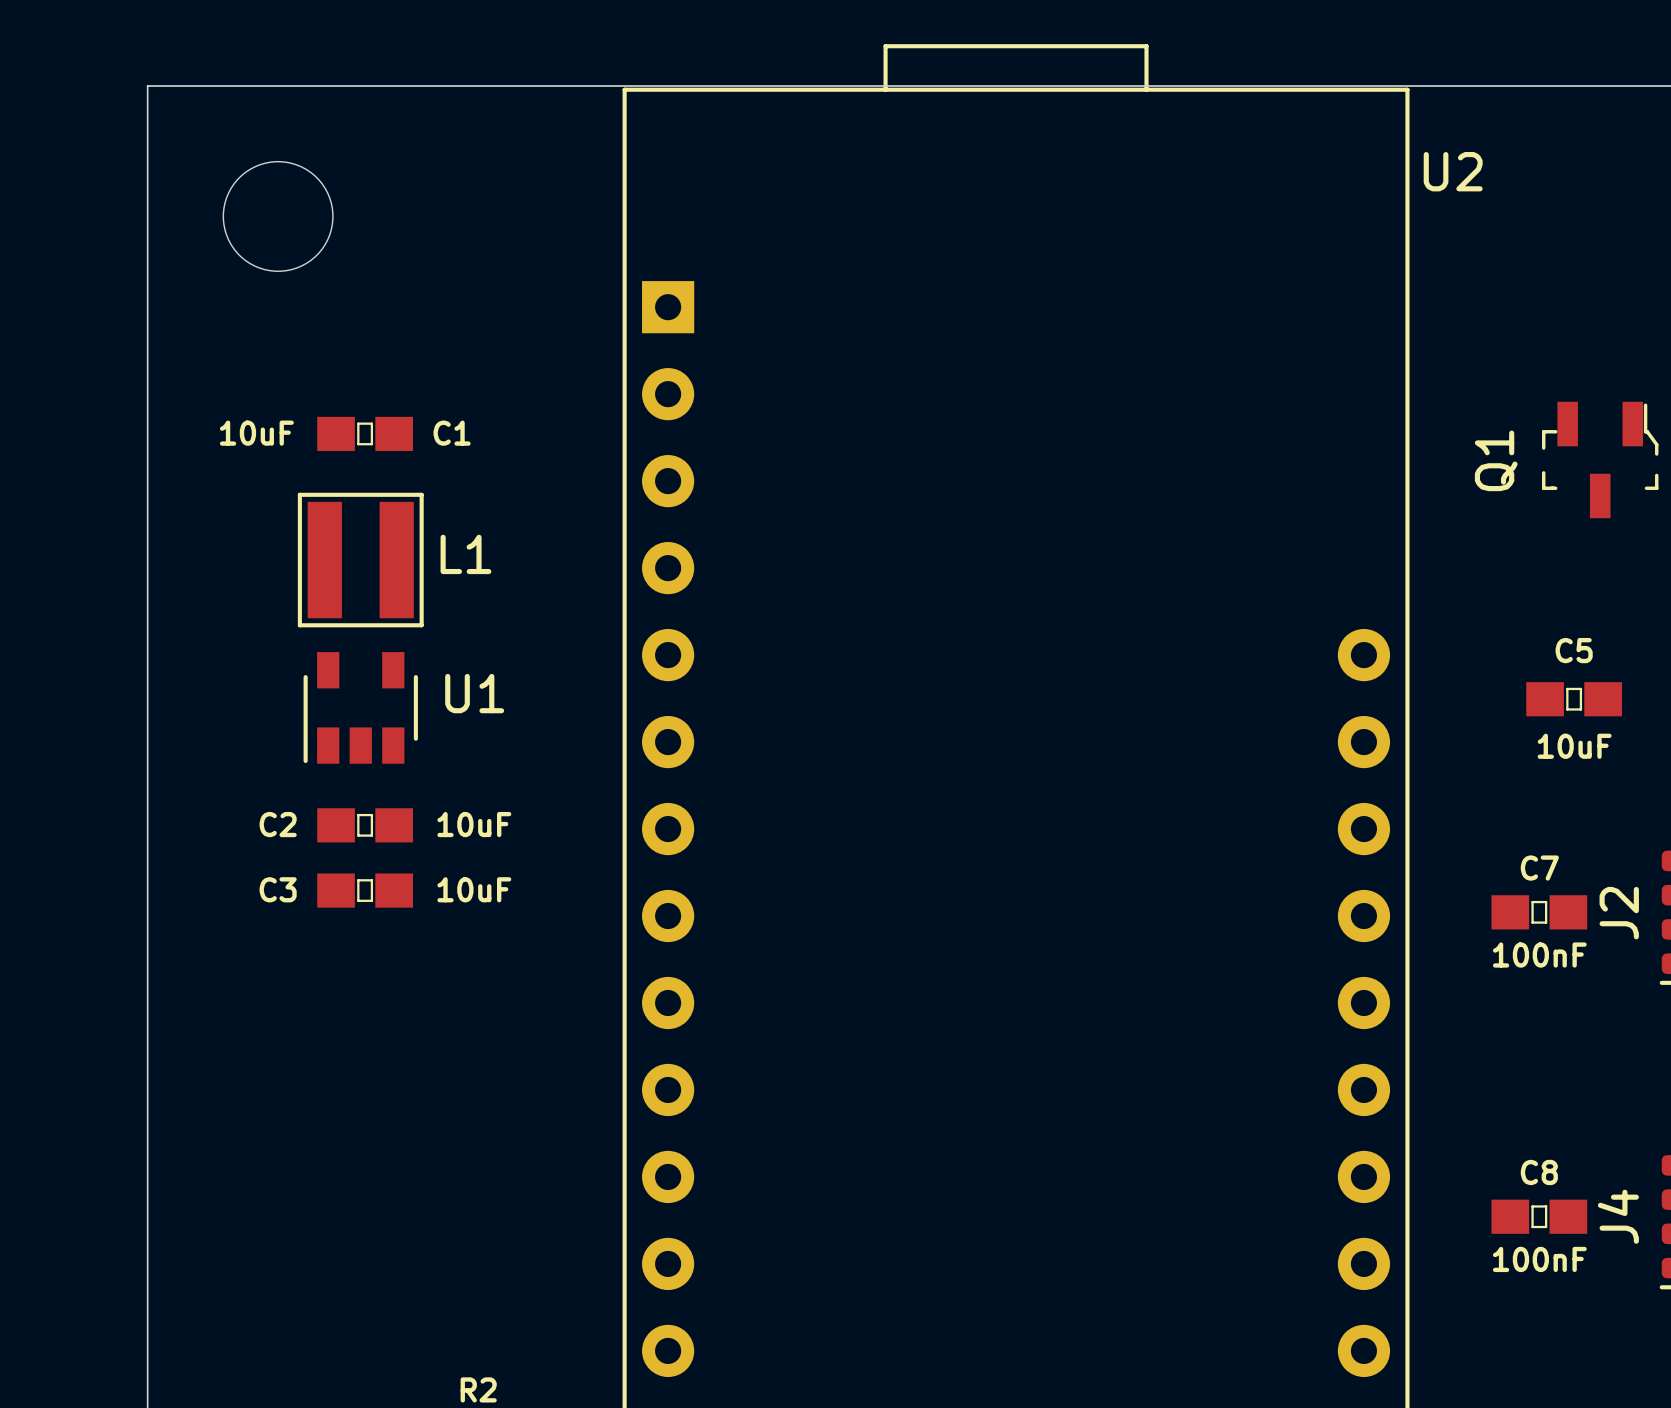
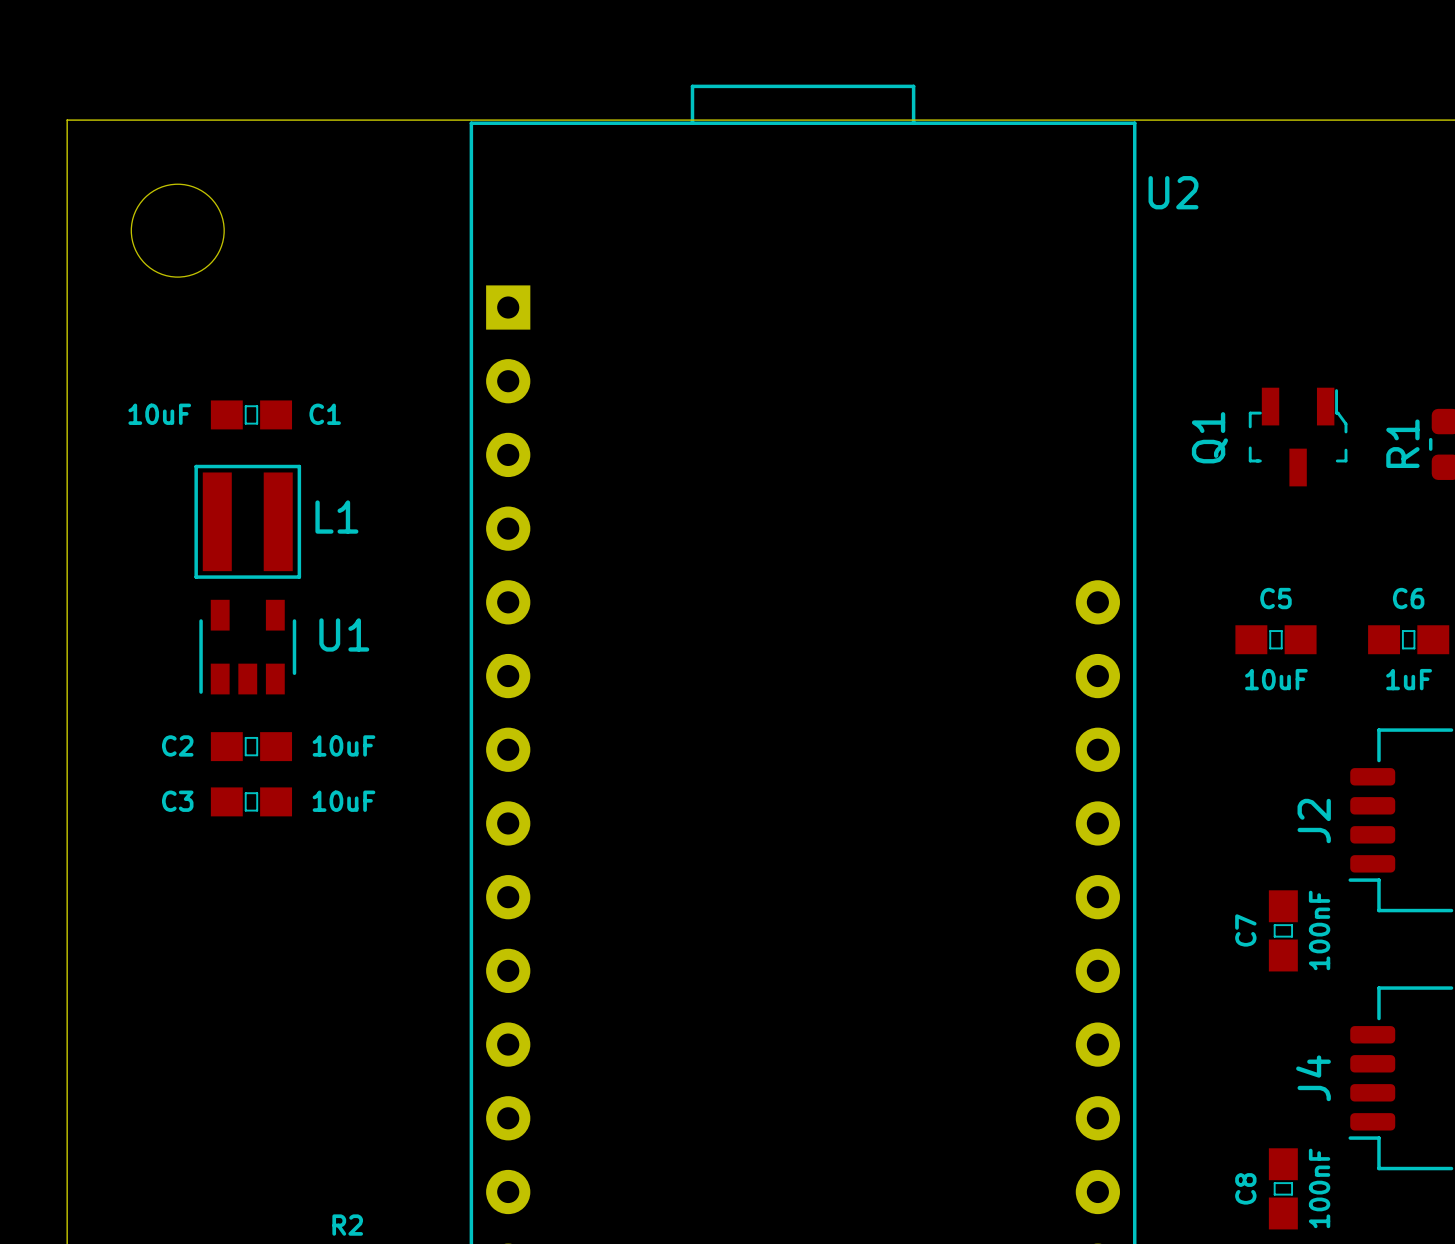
C7 rotation: 0° (1539, 912) -> 90° clockwise (1283, 930)
C7 position: (1539, 912) -> (1283, 930)
C8 rotation: 0° (1539, 1216) -> 90° clockwise (1283, 1188)
C8 position: (1539, 1216) -> (1283, 1188)

